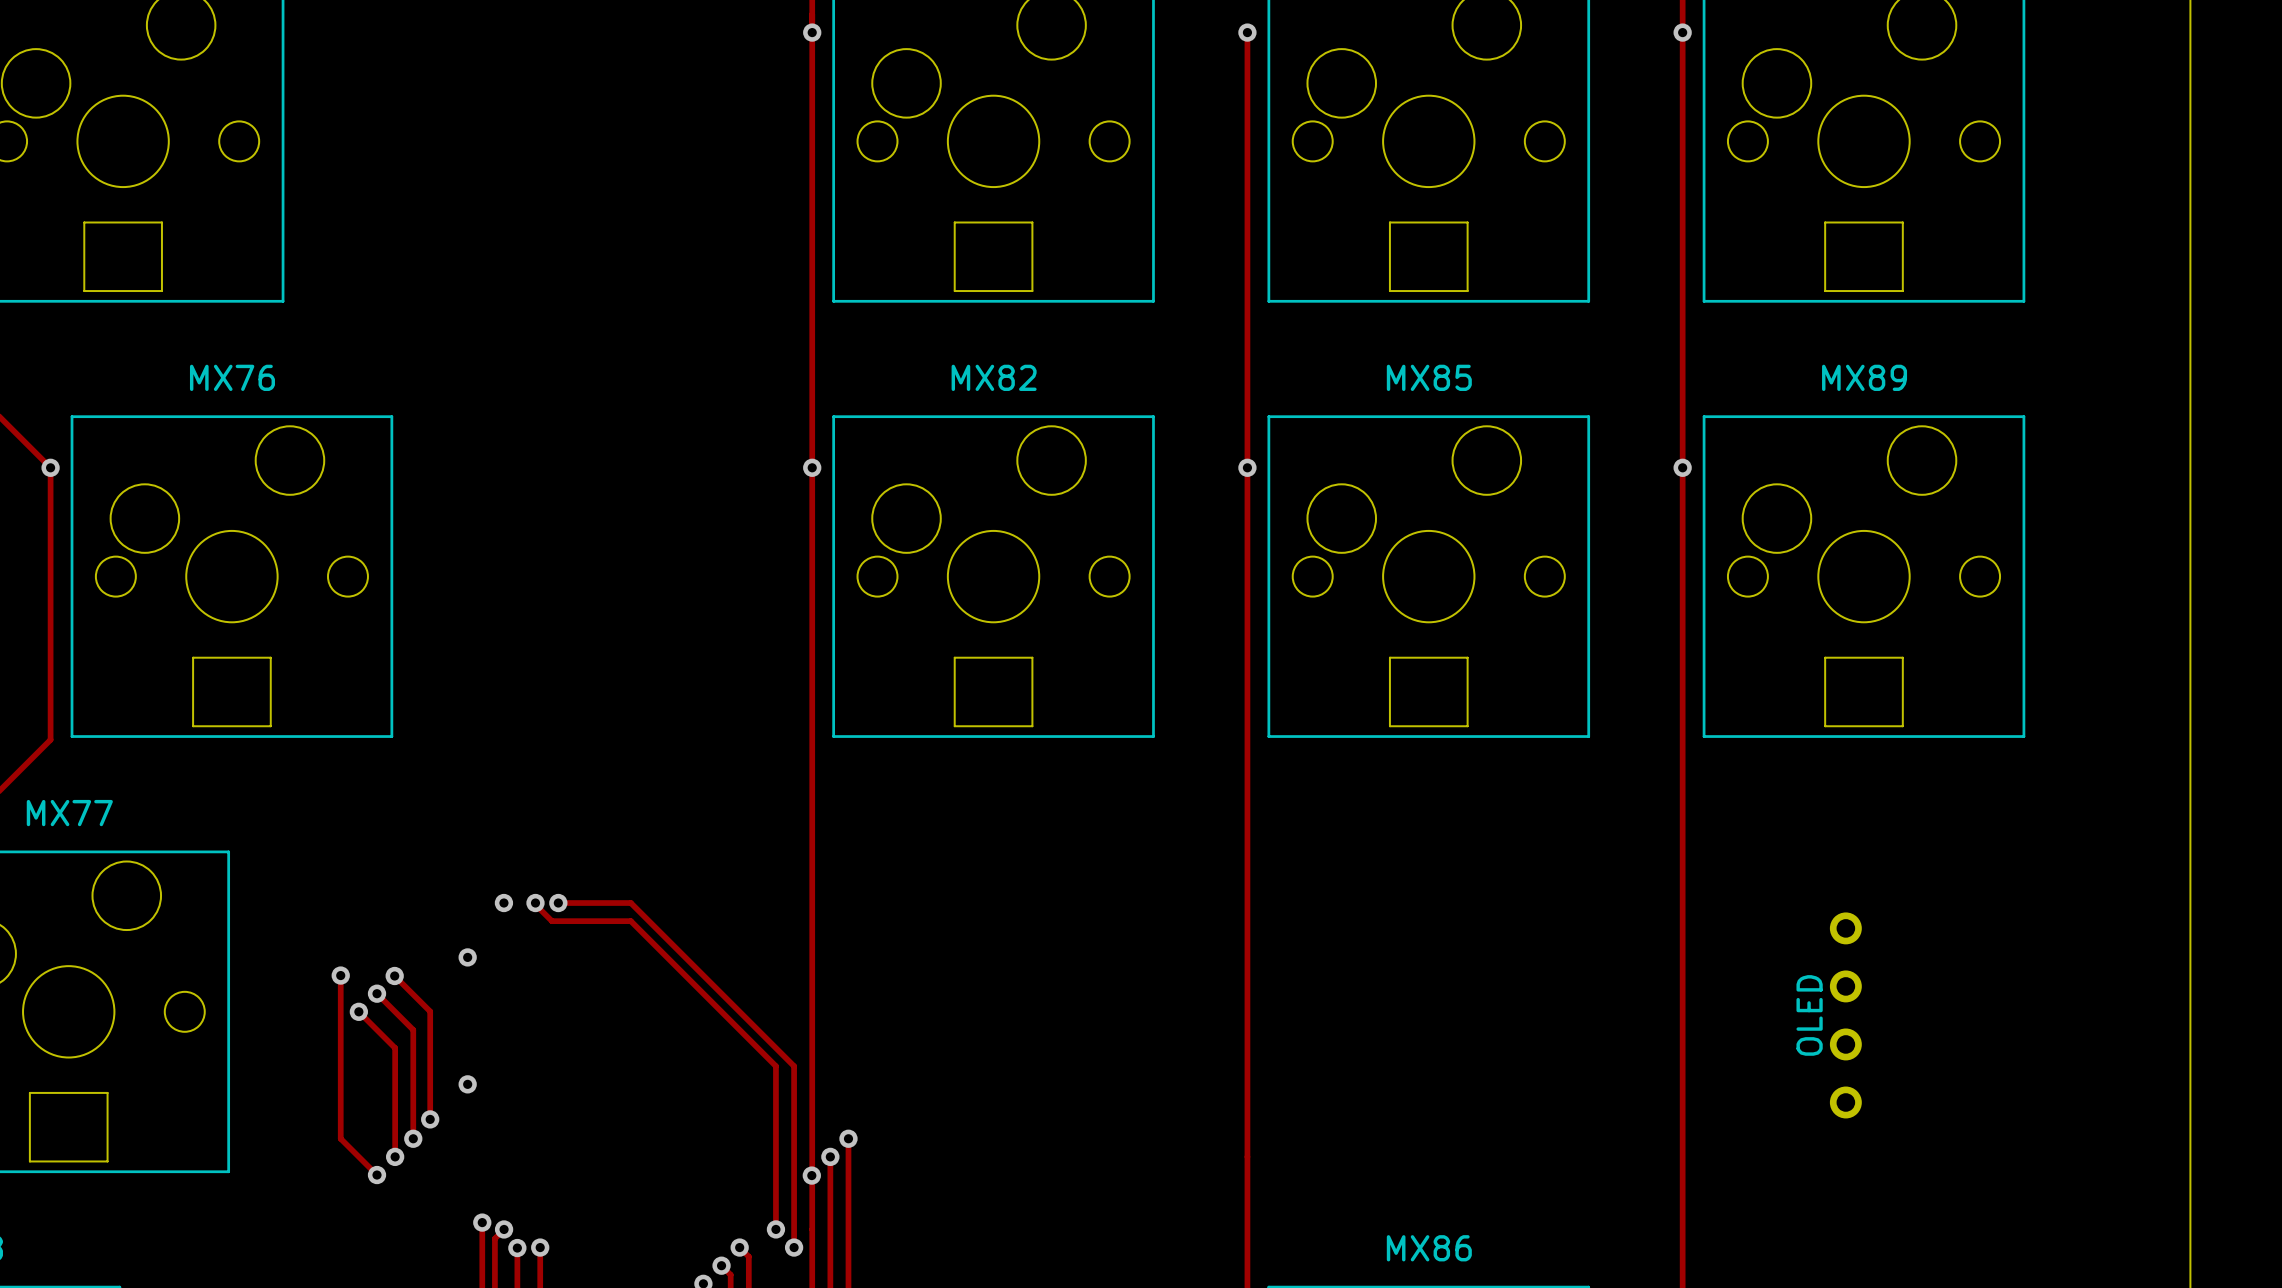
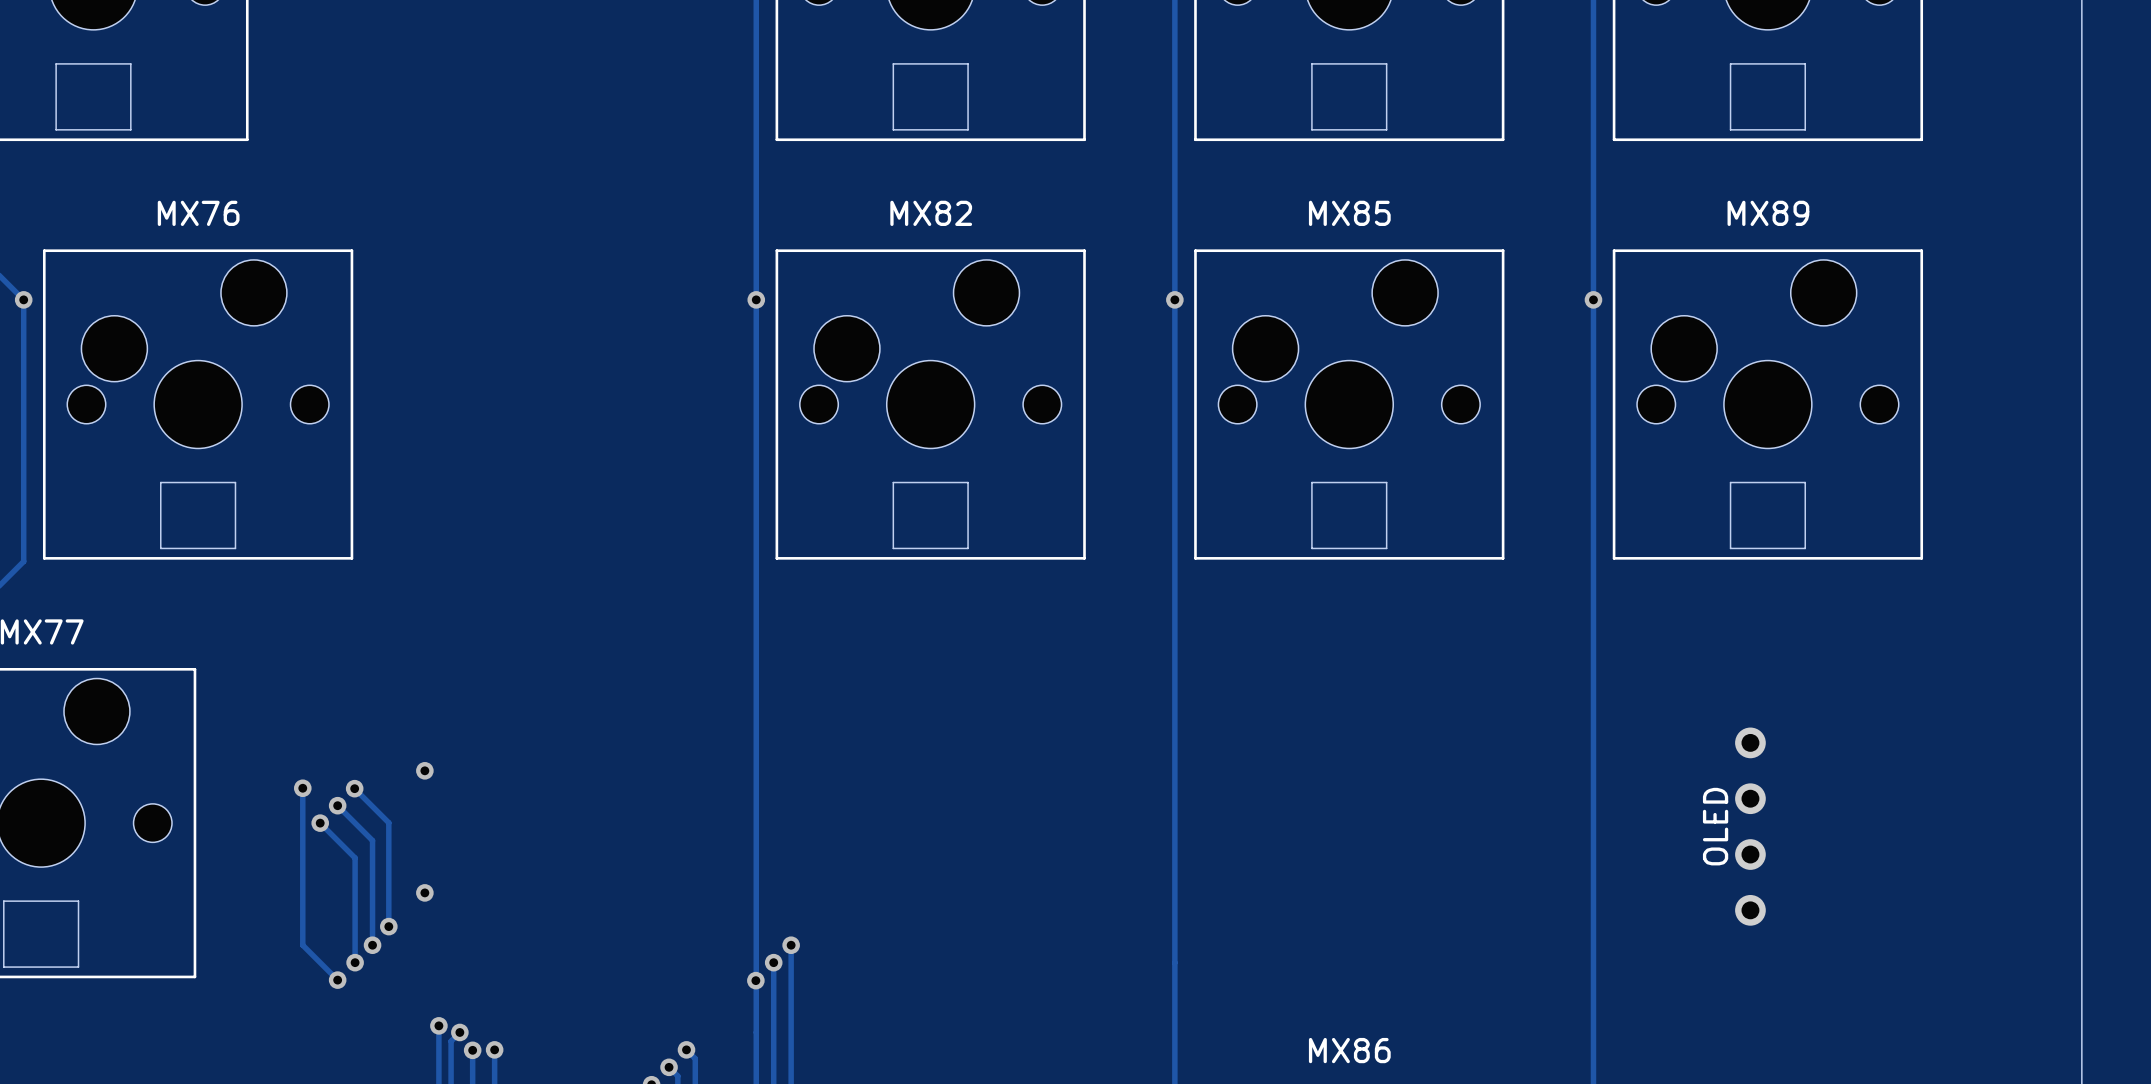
via: (503, 903) -> none
track: (535, 903) (551, 921) (630, 921) (775, 1066) (775, 1229) -> none
via: (535, 903) -> none
track: (558, 903) (630, 903) (794, 1066) (794, 1247) -> none
via: (558, 903) -> none
via: (775, 1229) -> none
via: (794, 1247) -> none

